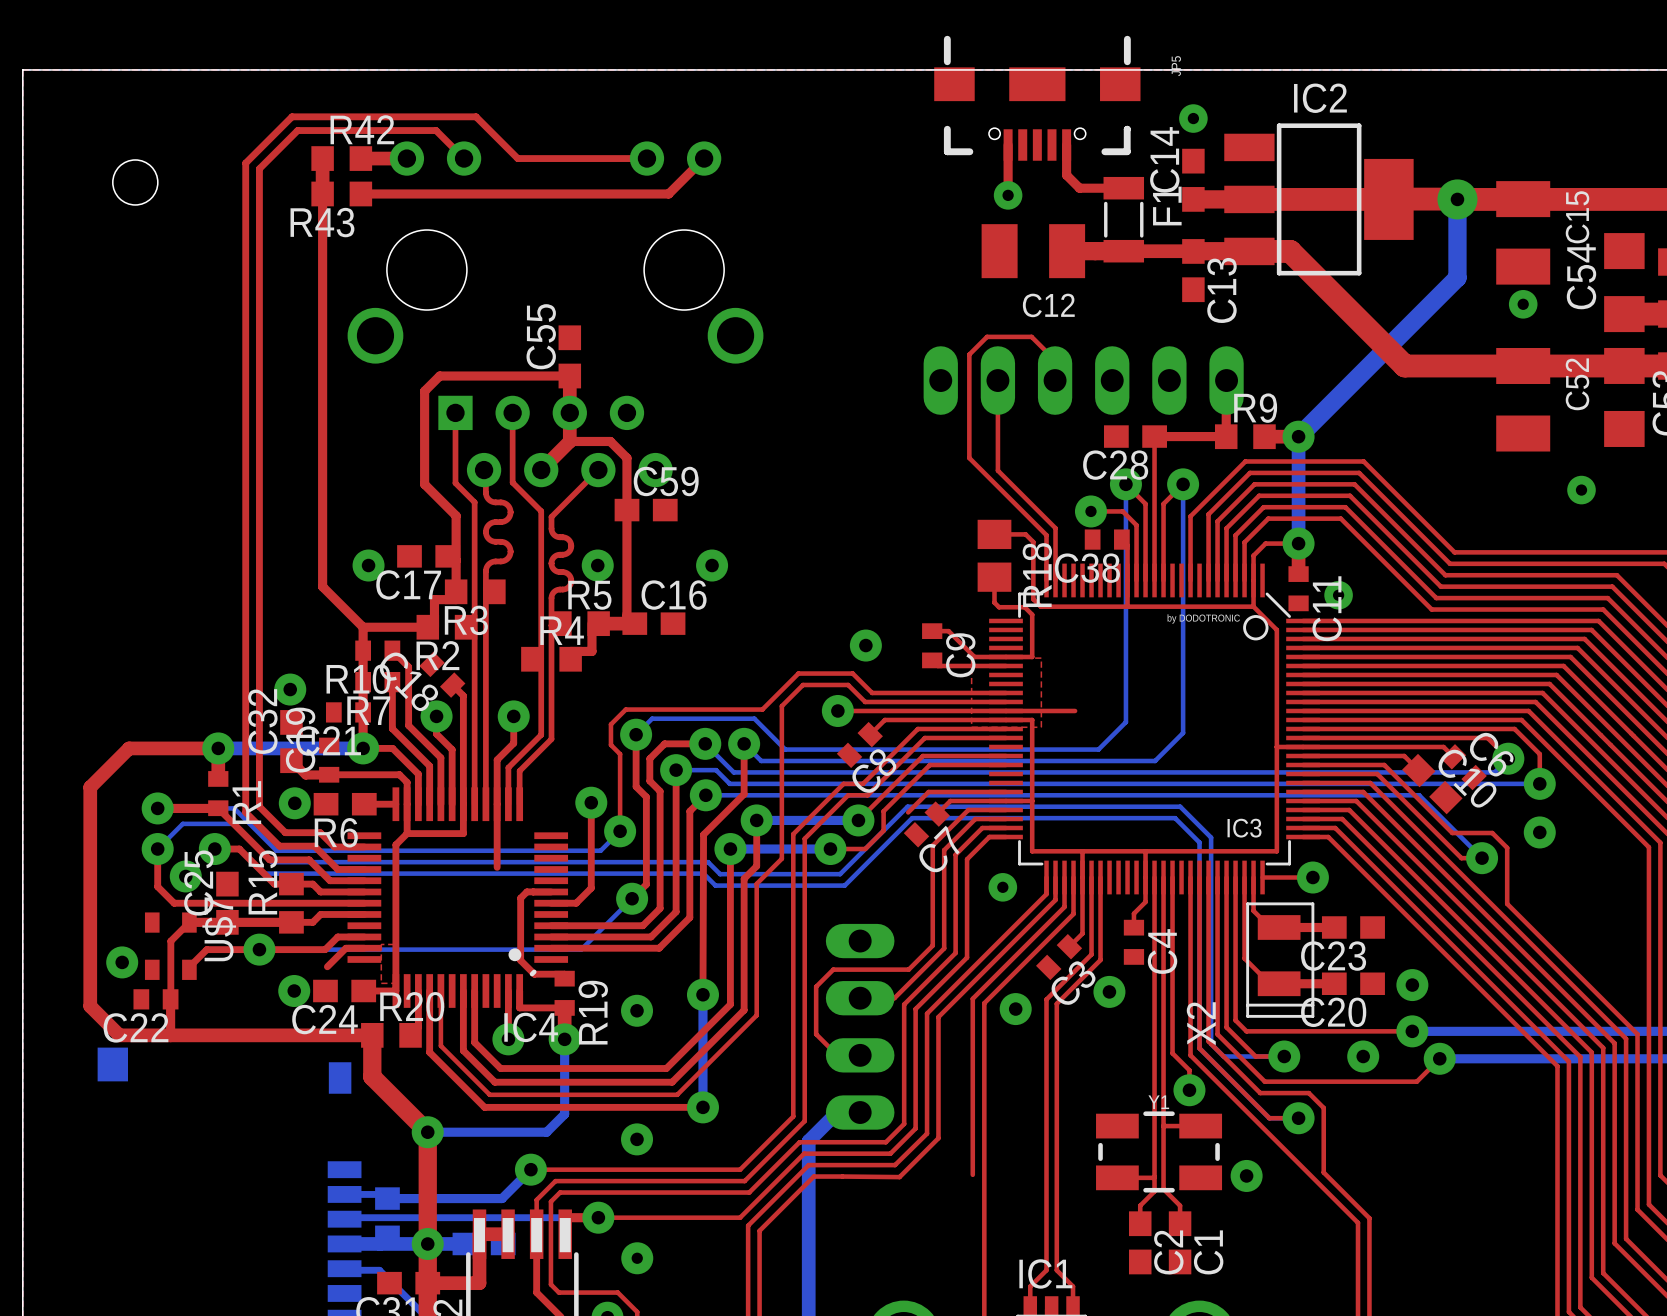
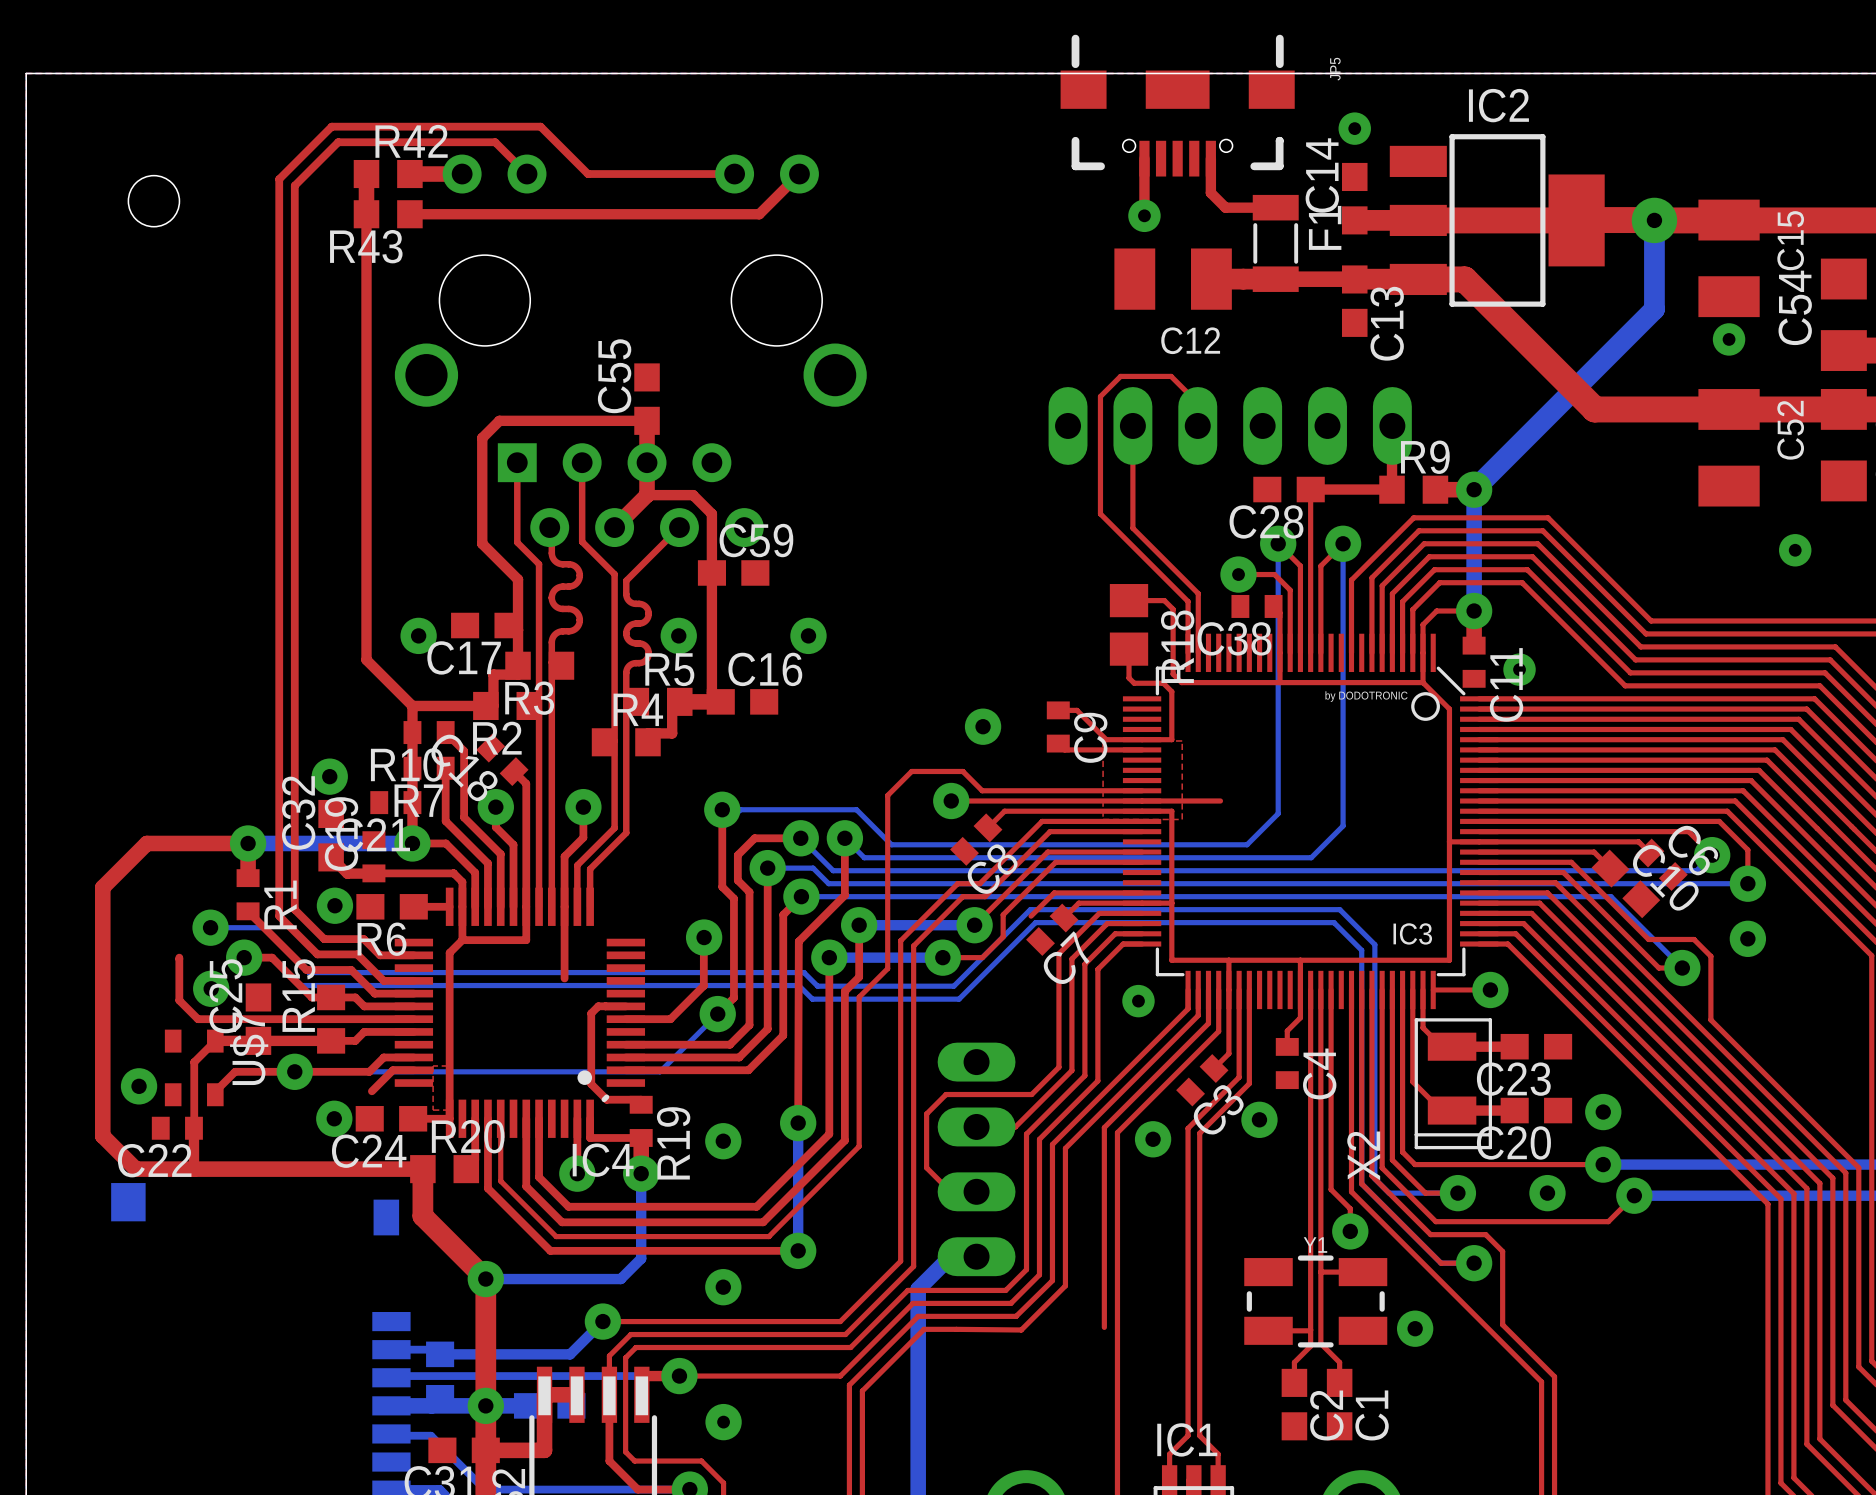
top track: (1006, 692) (872, 692) (852, 673) (798, 673) (762, 709) (625, 709) (610, 724) (610, 744) (620, 754) (620, 831) -> none
via position: (636, 734) -> (722, 809)
top track: (591, 802) (591, 888) (576, 903) -> (703, 938) (703, 985) (670, 1019) (654, 1019)
via: (591, 802) -> none
top track: (157, 808) (218, 808) -> none
bottom track: (157, 808) (234, 808) (276, 850) (600, 850) (620, 831) -> none
via: (157, 808) -> none
via: none -> (210, 927)
bottom track: (233, 823) (182, 823) (157, 849) -> (265, 929) (210, 927)
via: (157, 849) -> none

